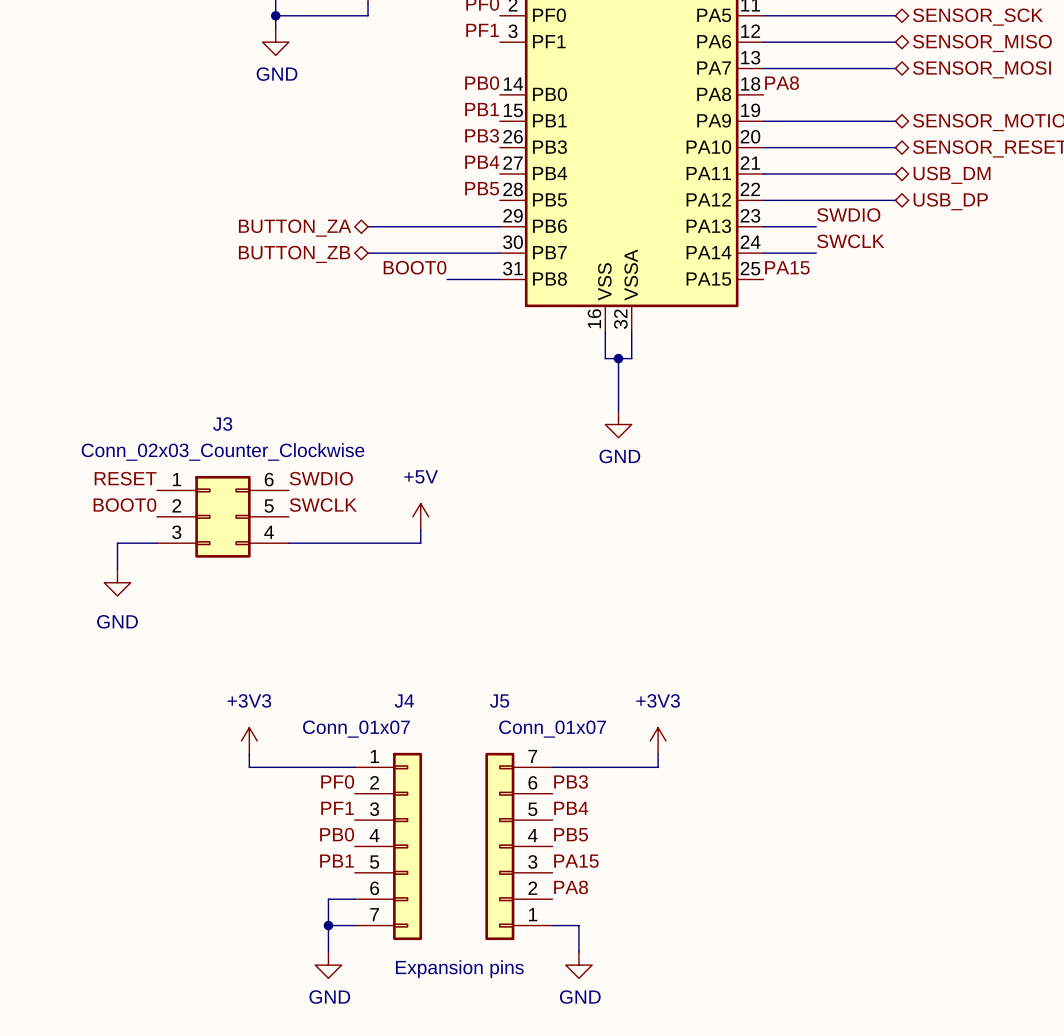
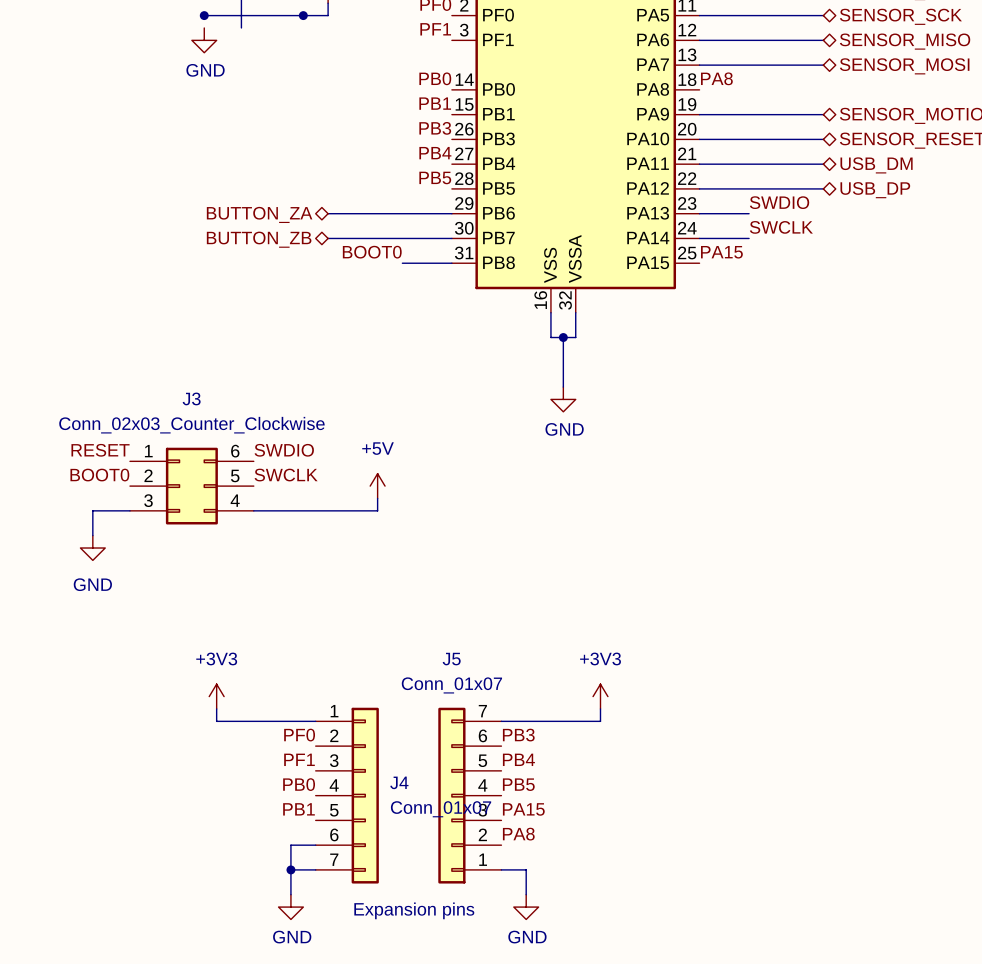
wire: none -> (204, 15) (241, 15)
junction: none -> (204, 15)
junction: (275, 15) -> none
junction: none -> (303, 15)
power symbol position: GND (275, 42) -> GND (204, 40)
J4 name position: J4 (404, 701) -> J4 (399, 782)
J4 value position: Conn_01x07 (356, 729) -> Conn_01x07 (441, 809)
J5 value position: Conn_01x07 (552, 729) -> Conn_01x07 (451, 685)

